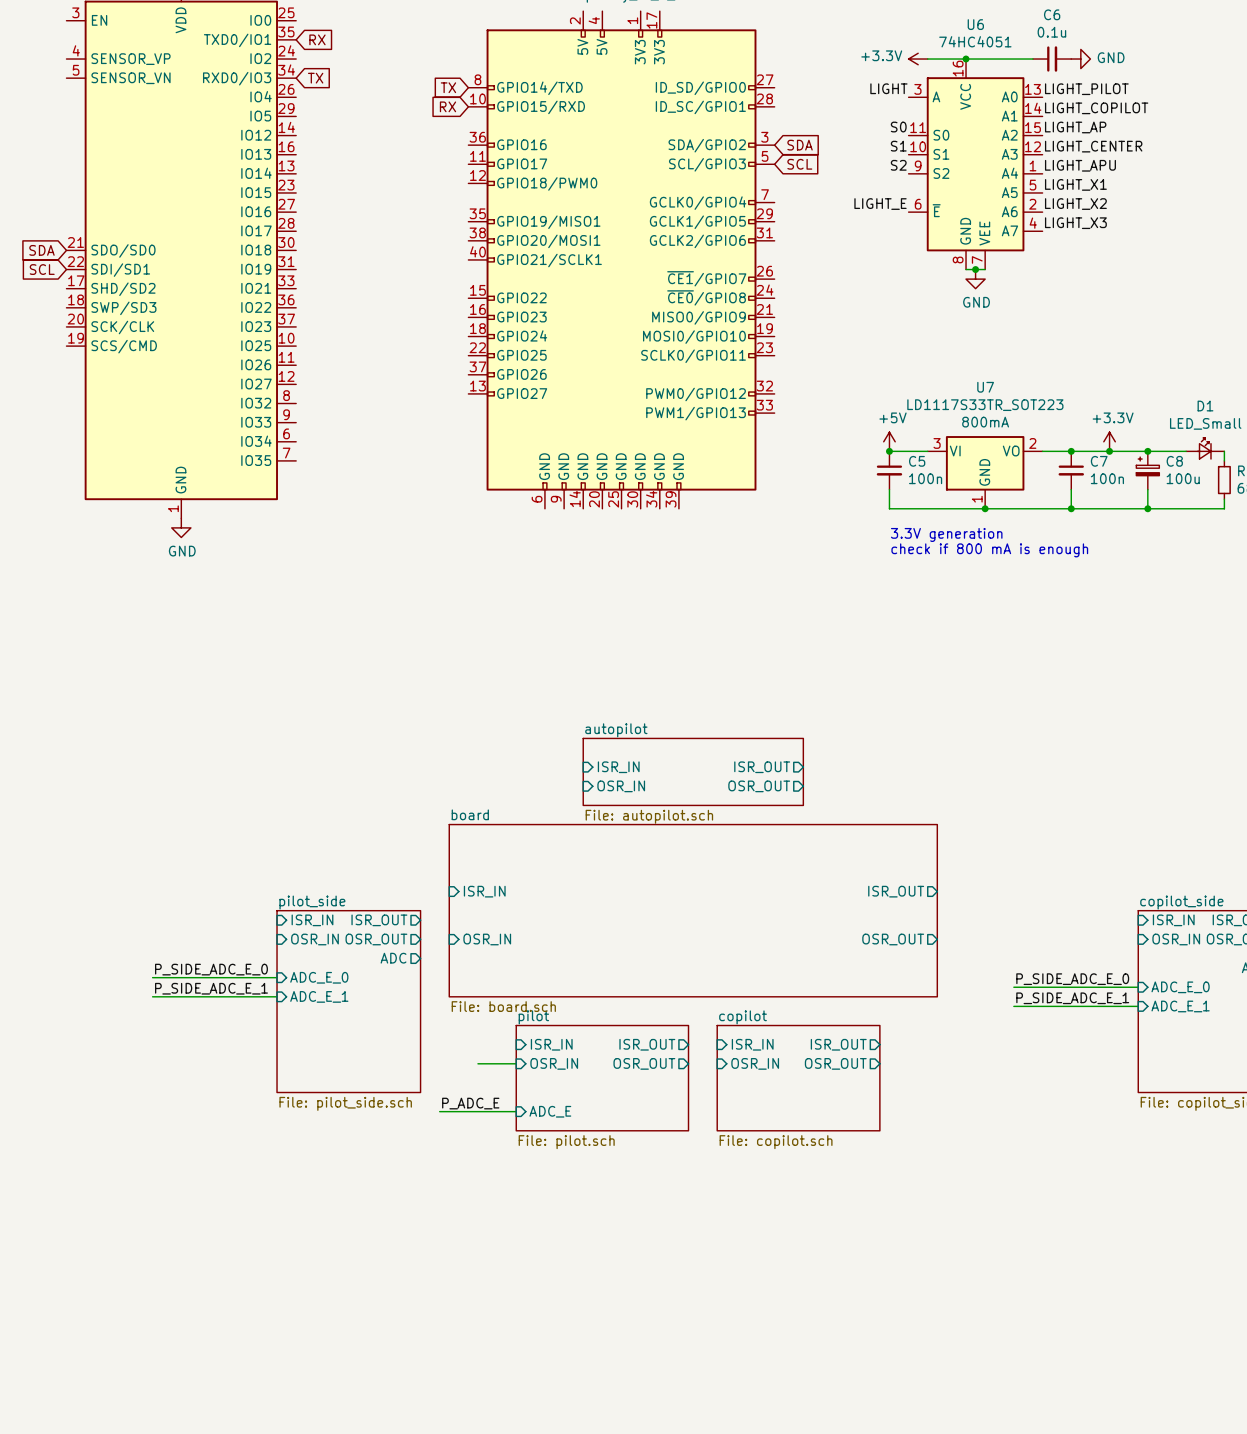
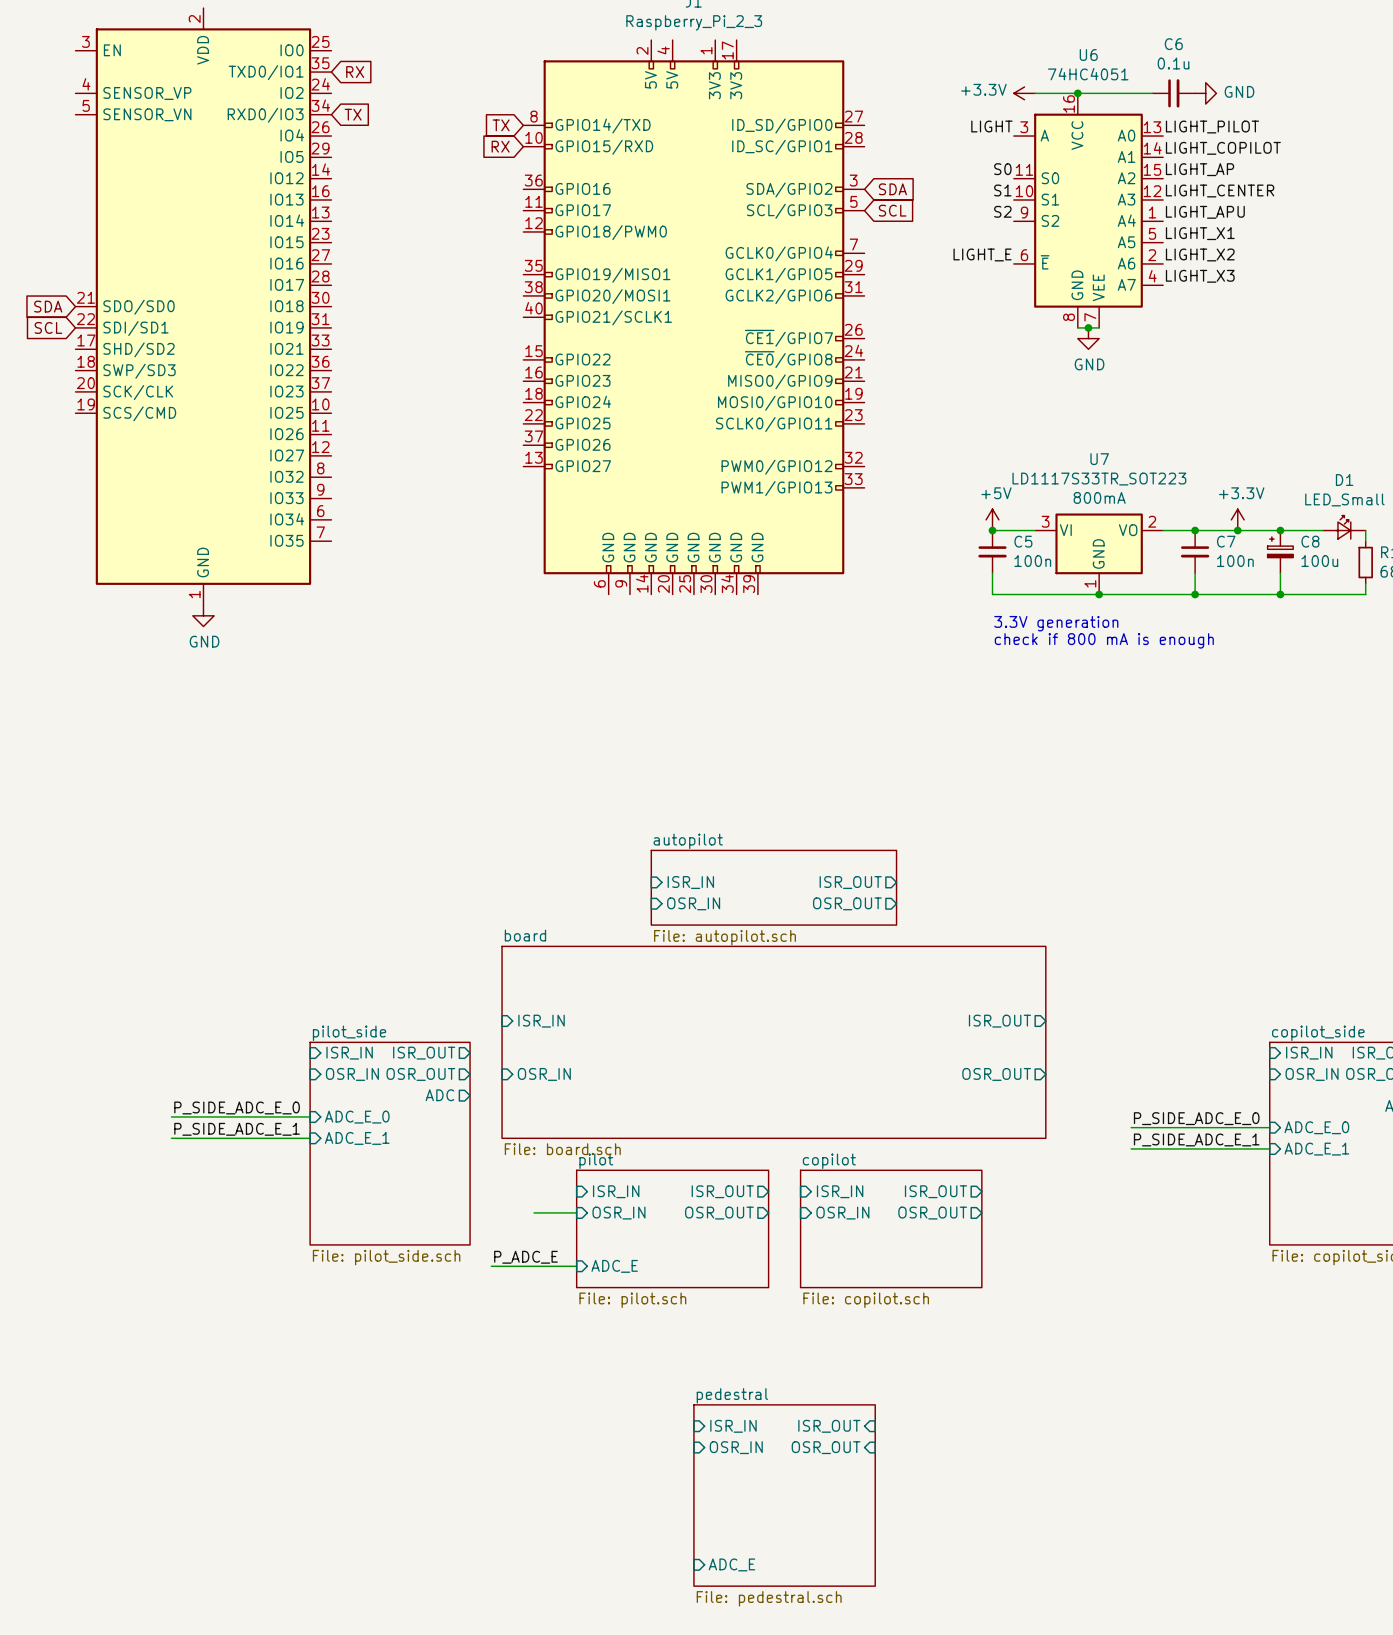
sheet pin: none -> ISR_IN (733, 1426)
sheet pin: none -> ISR_OUT (829, 1426)
sheet pin: none -> OSR_IN (736, 1447)
sheet pin: none -> OSR_OUT (826, 1447)
sheet pedestral: none -> File: pedestral.sch (784, 1495)
sheet pin: none -> ADC_E (731, 1564)

